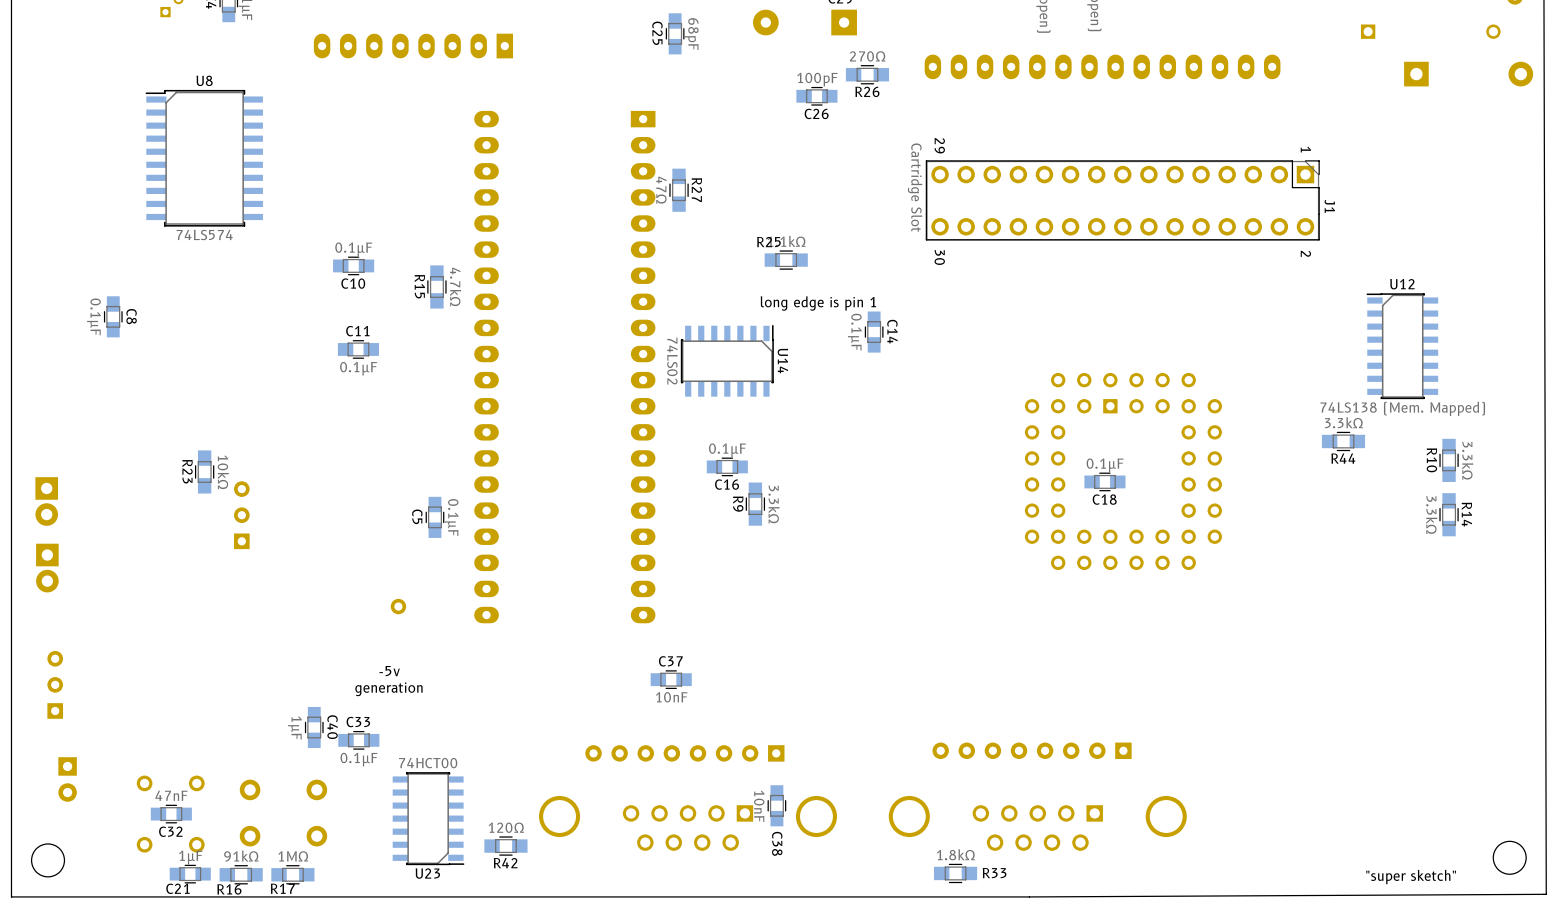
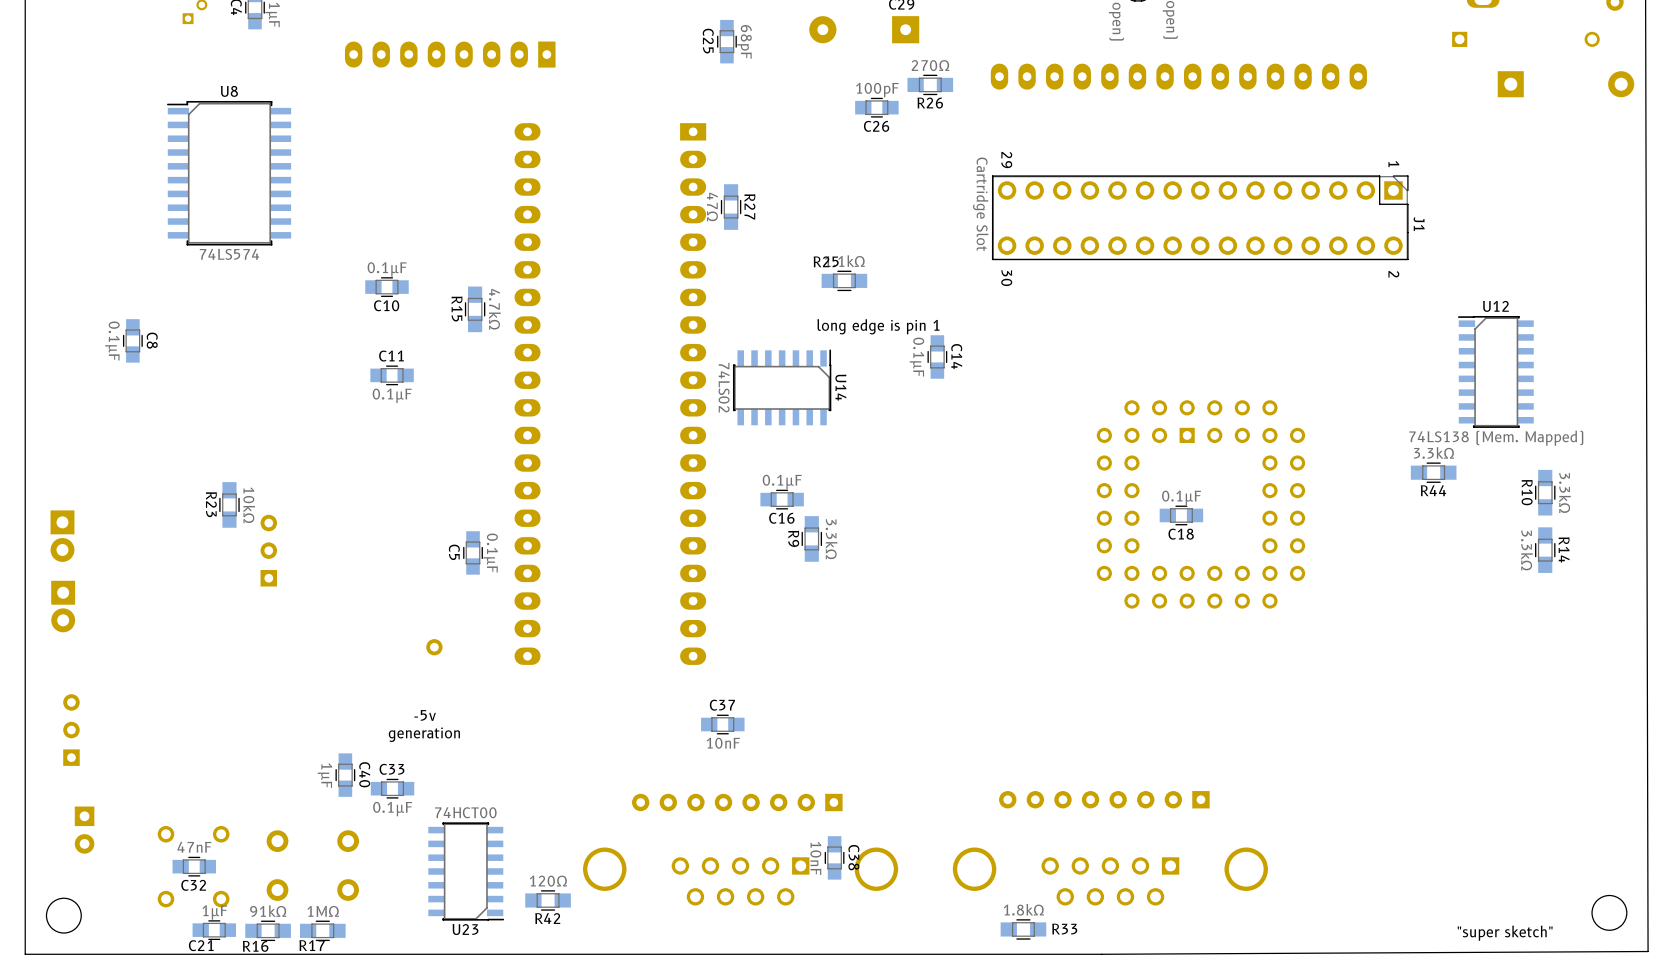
C38 name position: C38 (777, 843) -> C38 (853, 857)

